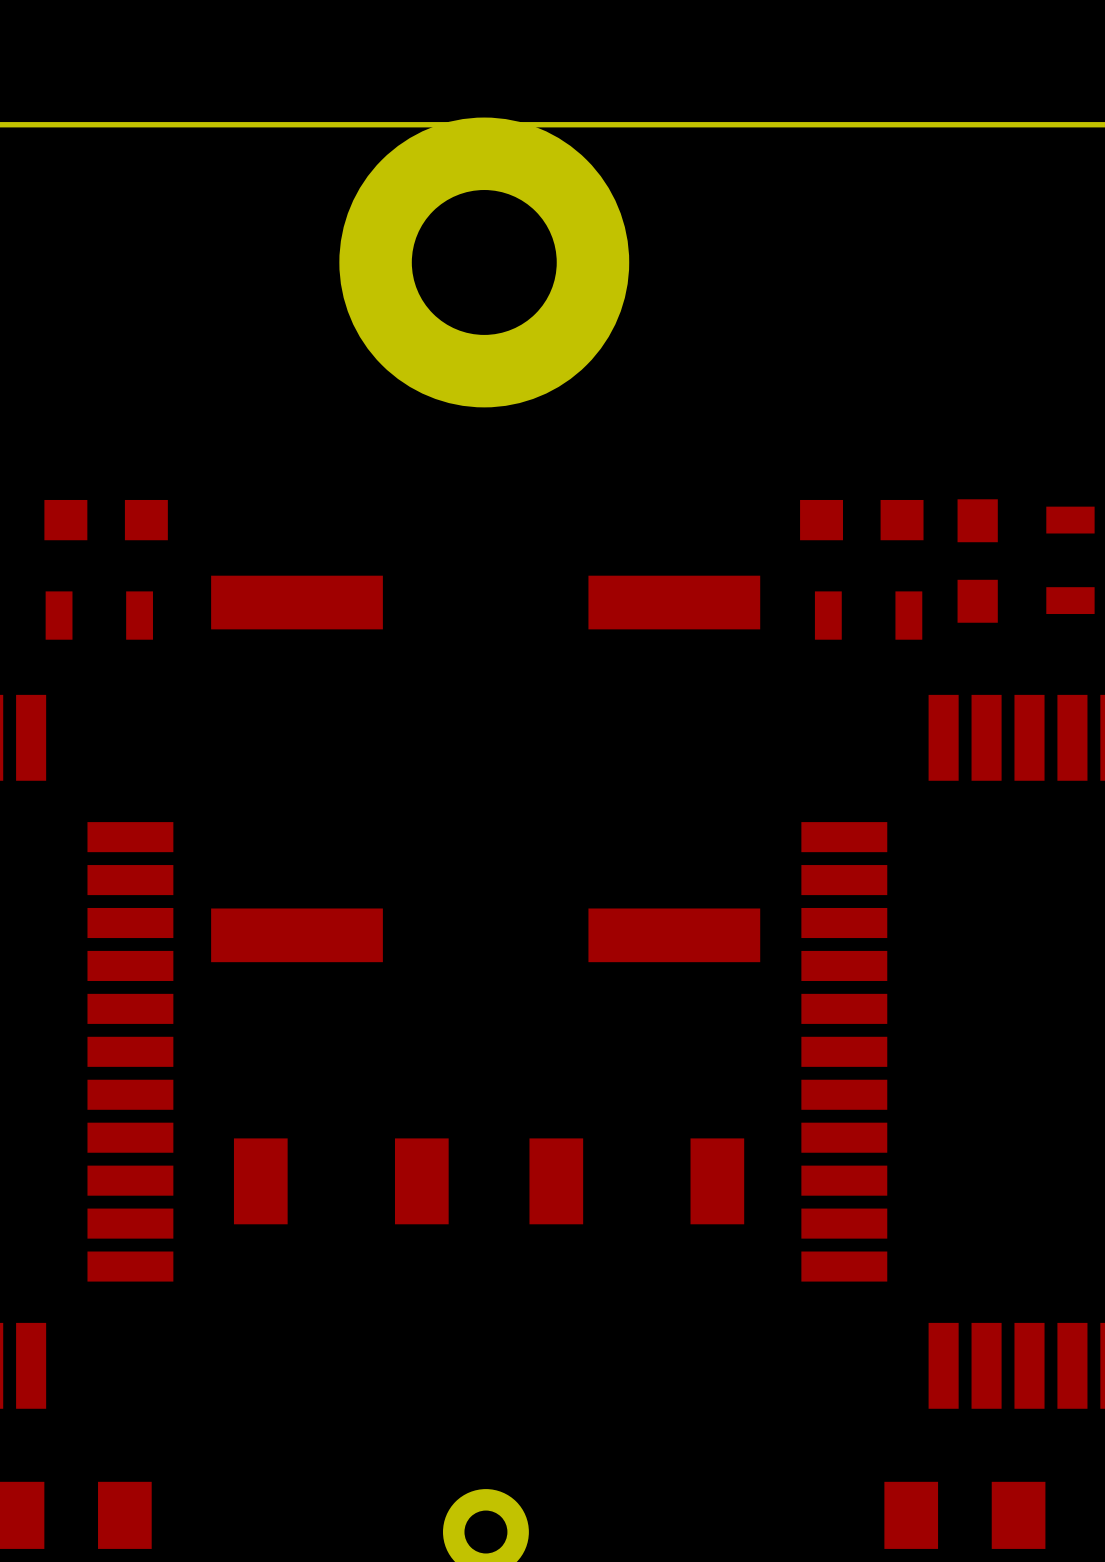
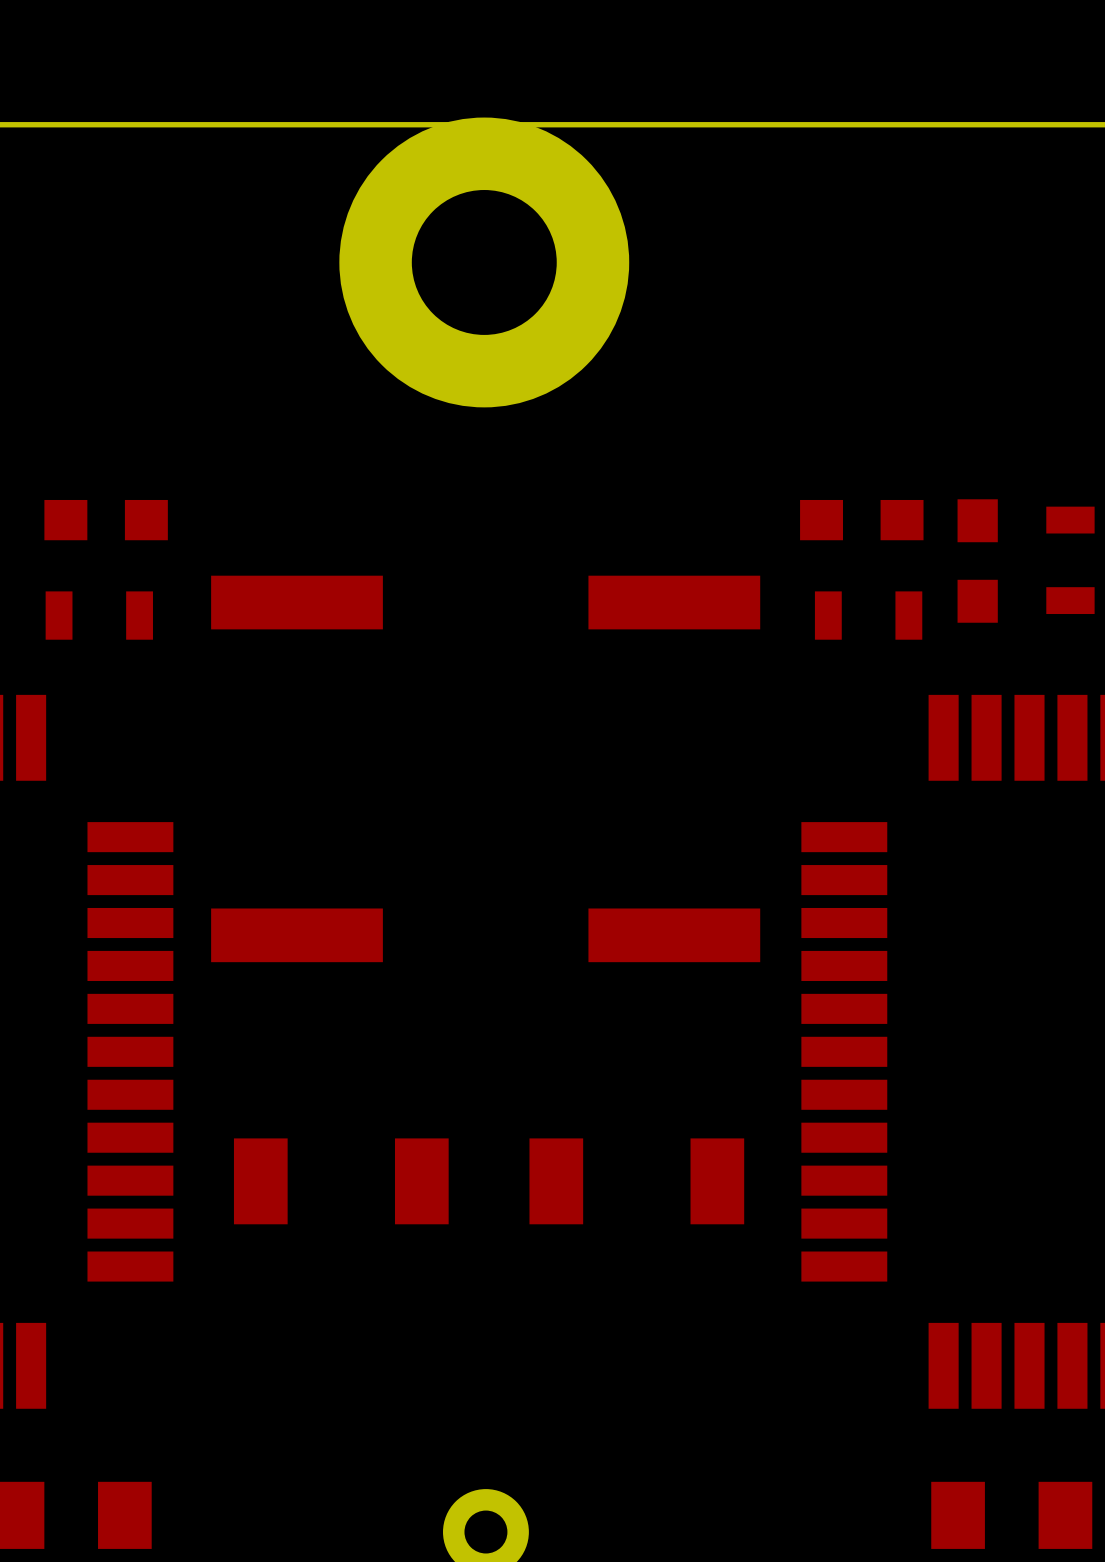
part position: (964, 1515) -> (1011, 1515)

